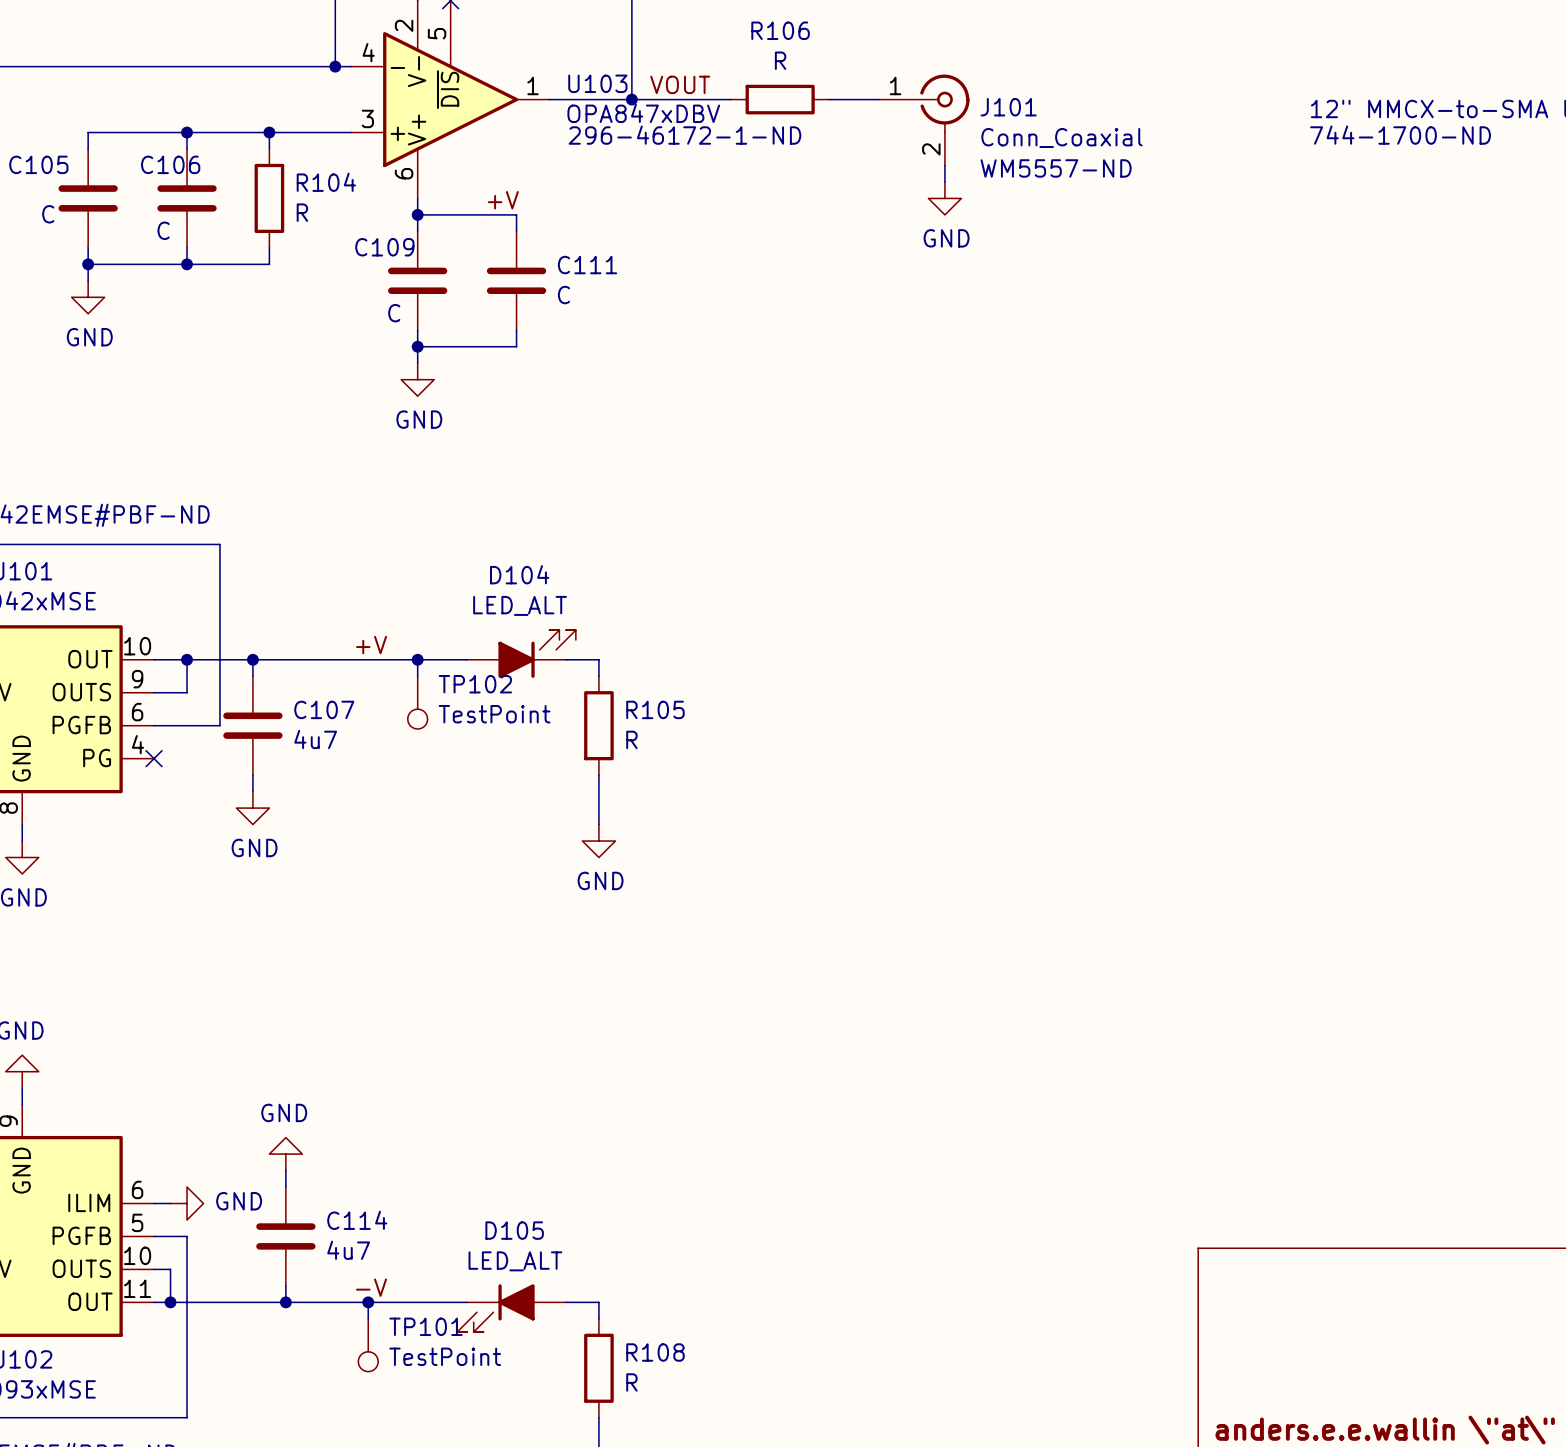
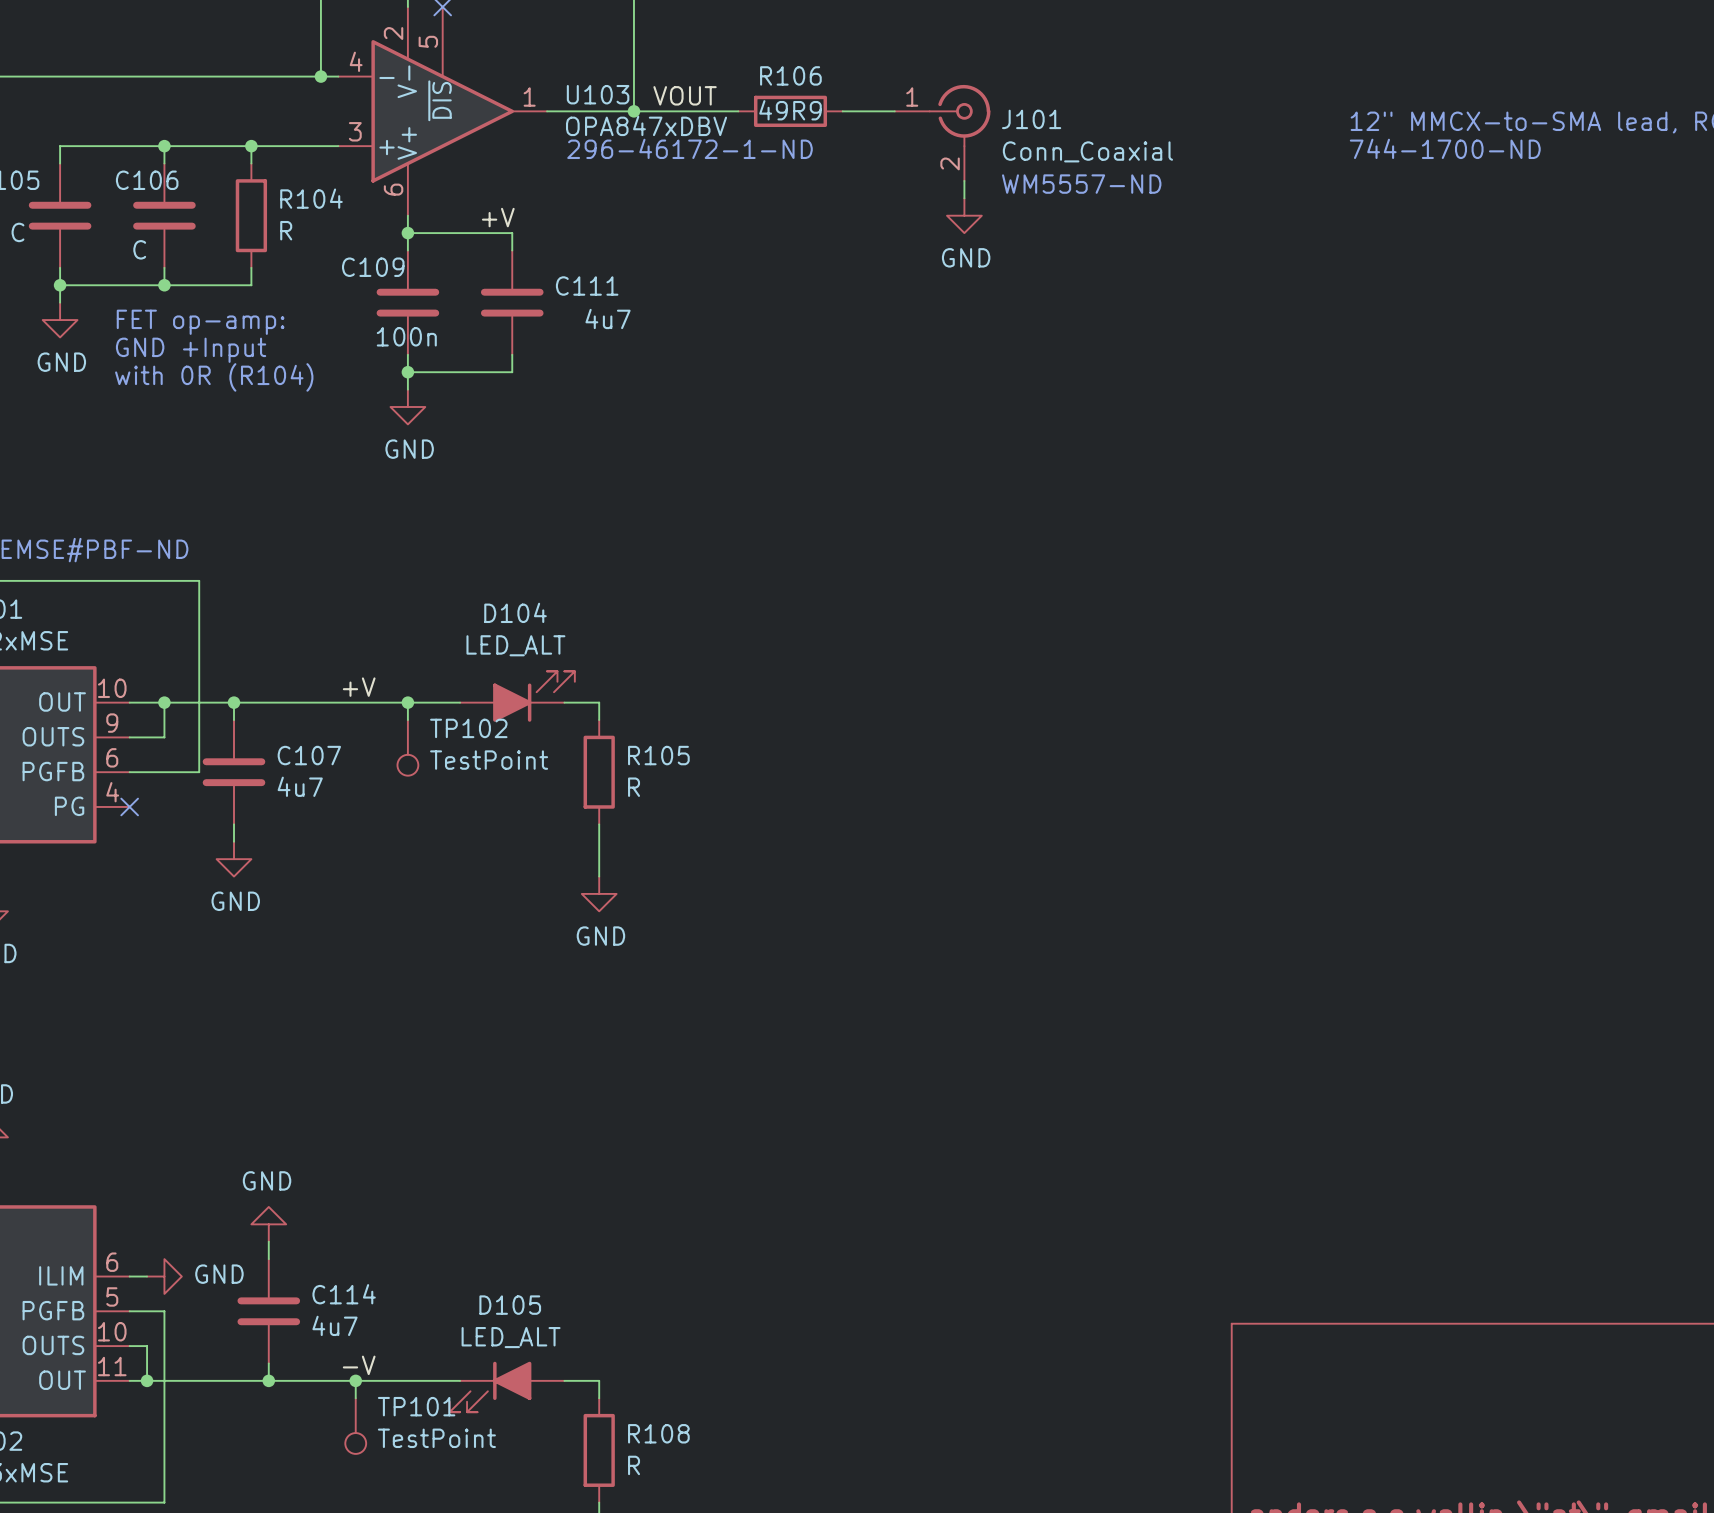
R106 name position: R106 (780, 30) -> R106 (790, 75)
R106 value: R (780, 60) -> 49R9 (790, 110)
C111 value: C (563, 295) -> 4u7 (608, 318)
text: none -> FET op-amp: (200, 322)
C109 value: C (394, 313) -> 100n (406, 336)
text: none -> GND +Input (191, 350)
text: none -> with 0R (R104) (214, 377)

